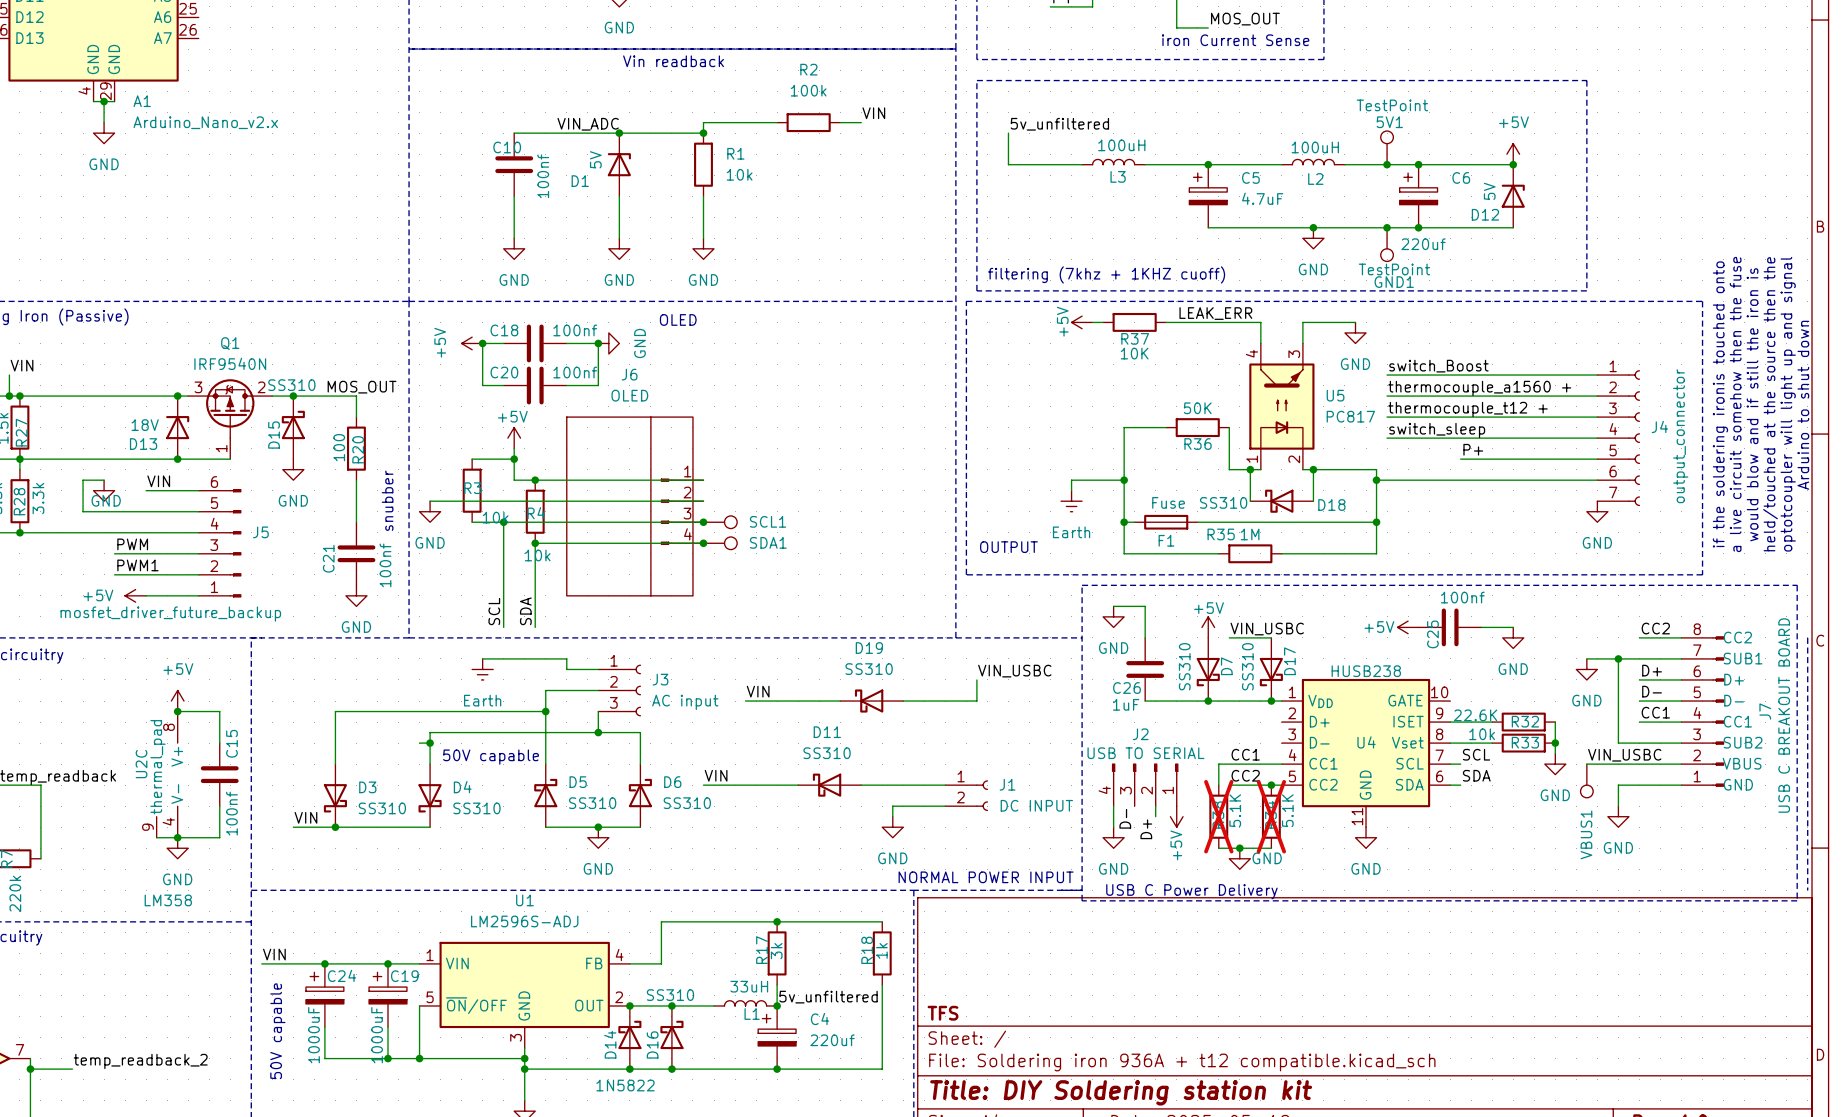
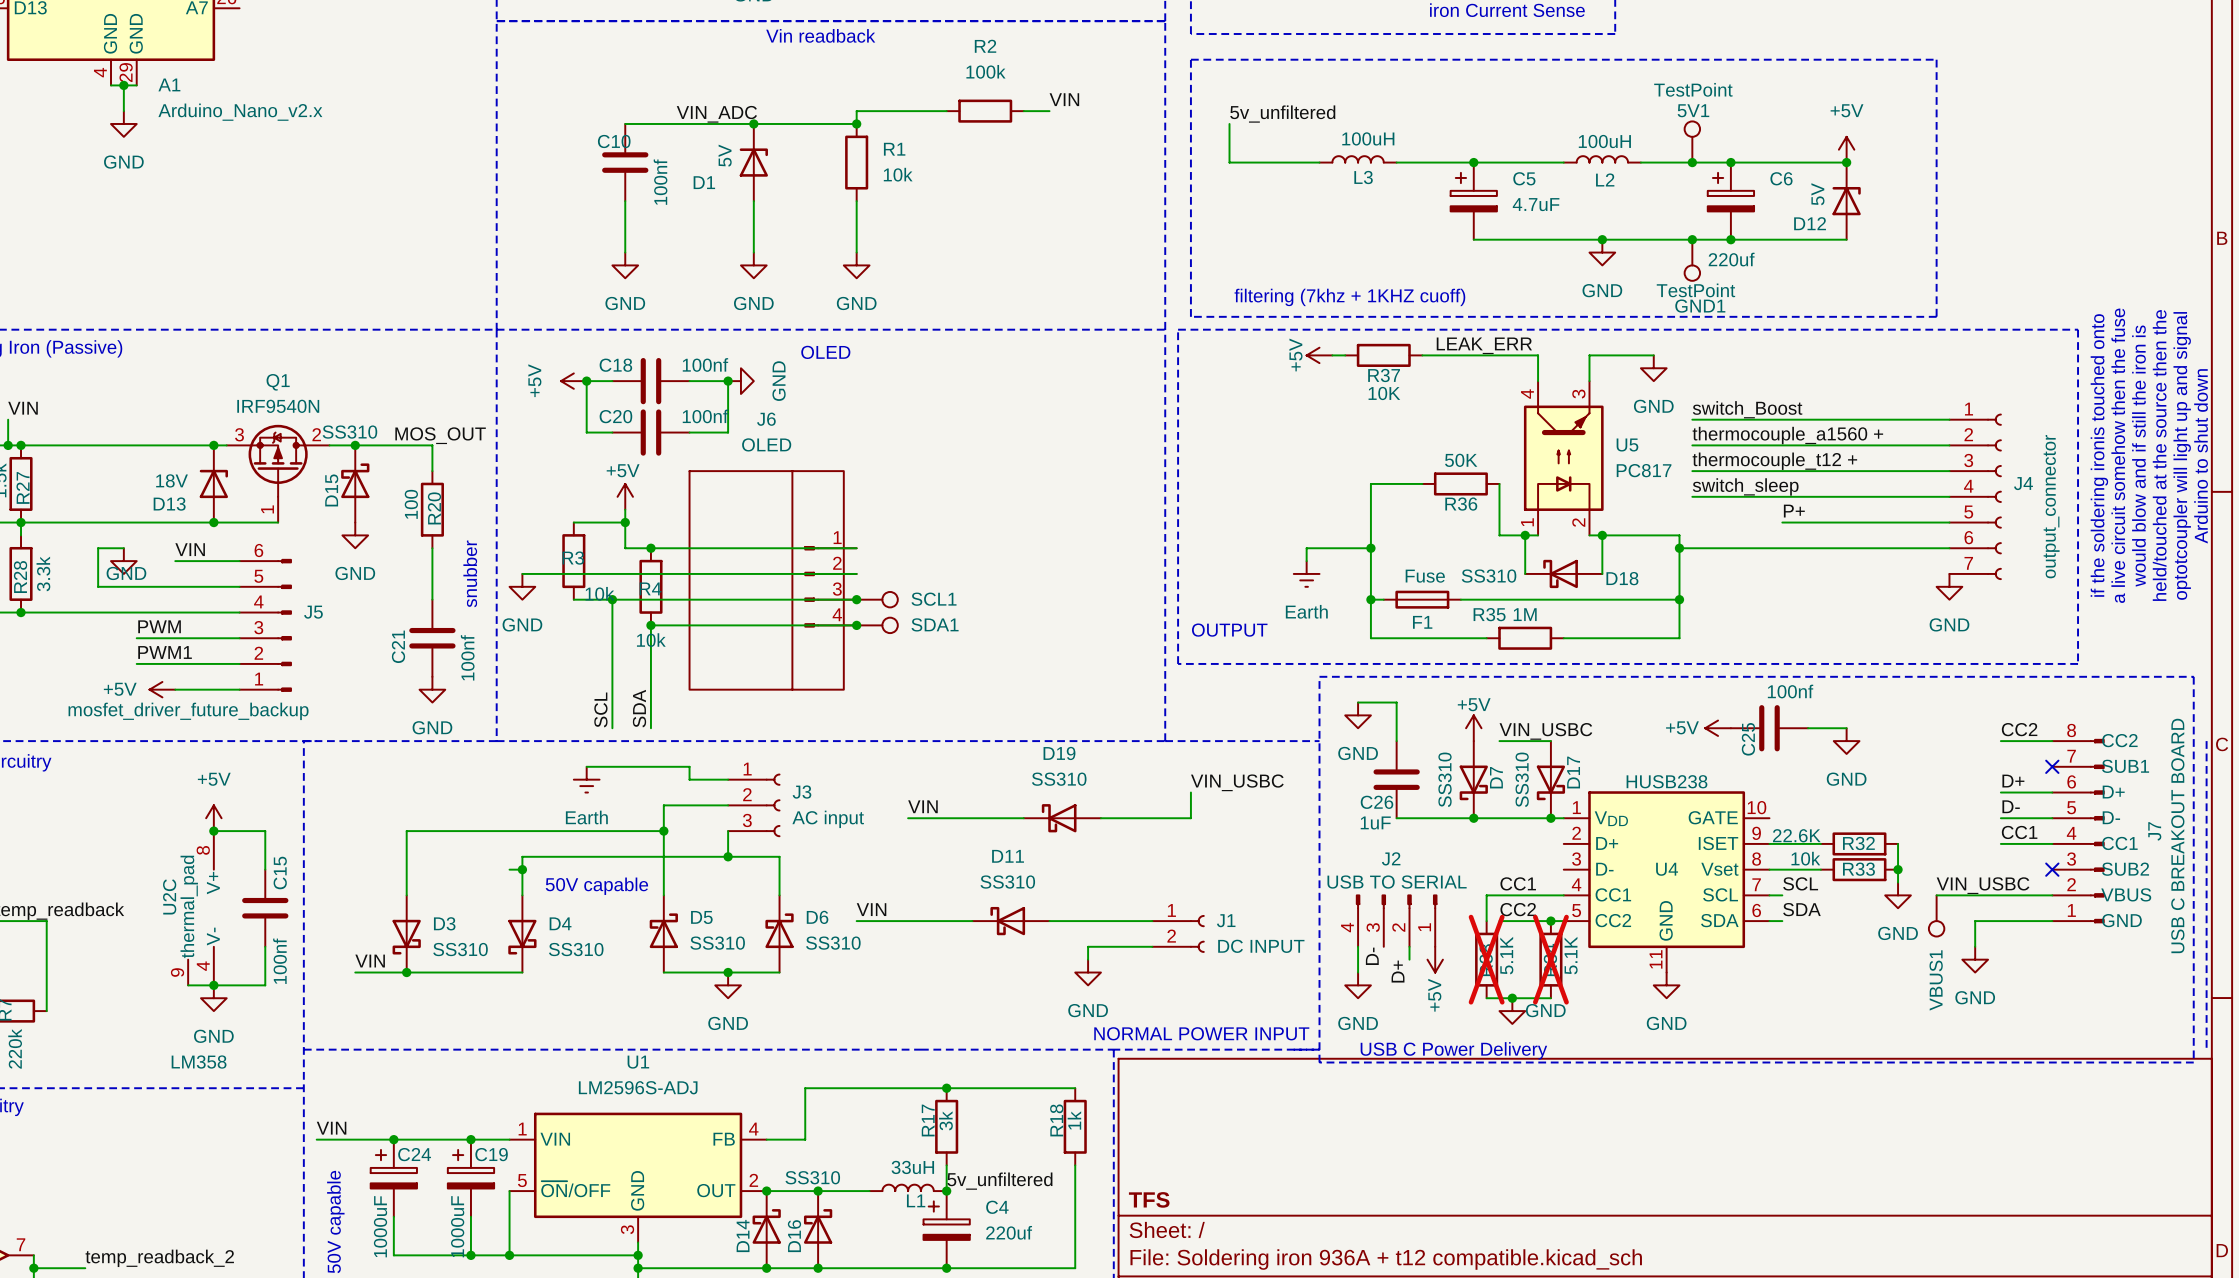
wire: (1586, 658) (1681, 658) -> none
wire: (1618, 658) (1618, 743) (1681, 743) -> none
junction: (1618, 658) -> none
no-connect mark: none -> (2052, 766)
power symbol: GND (1586, 669) -> none
no-connect mark: none -> (2052, 869)

